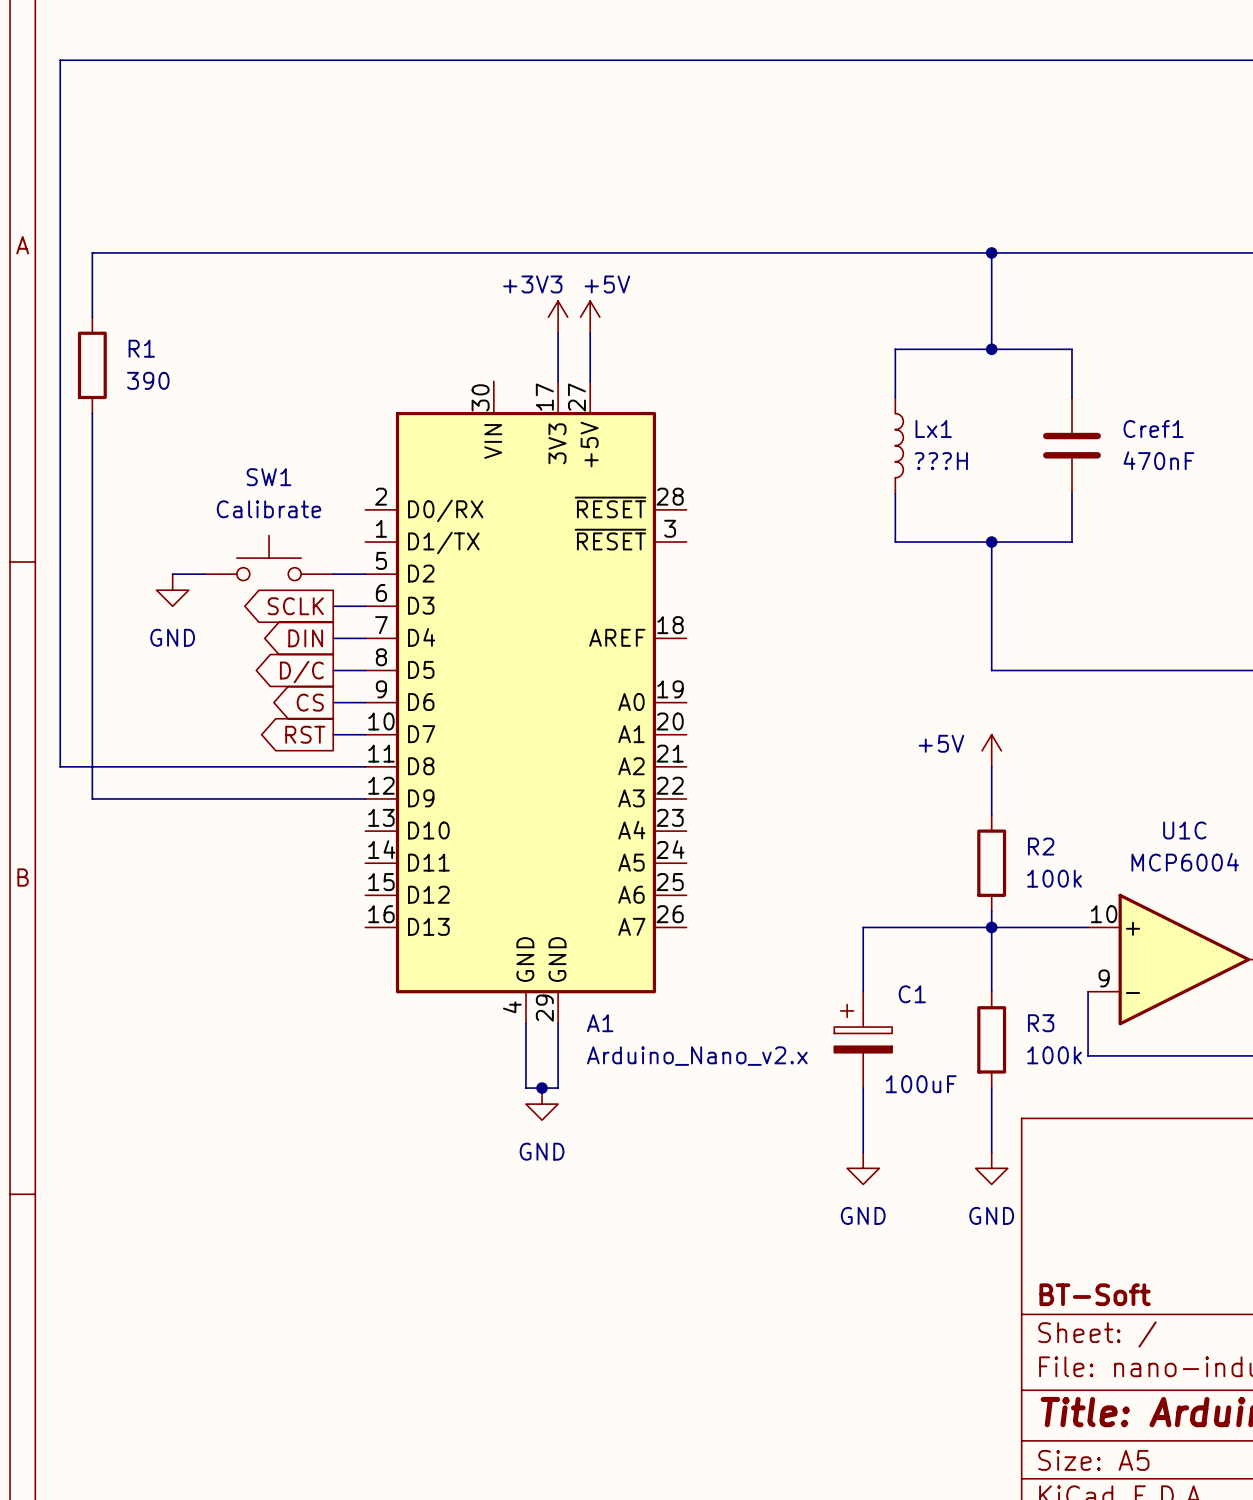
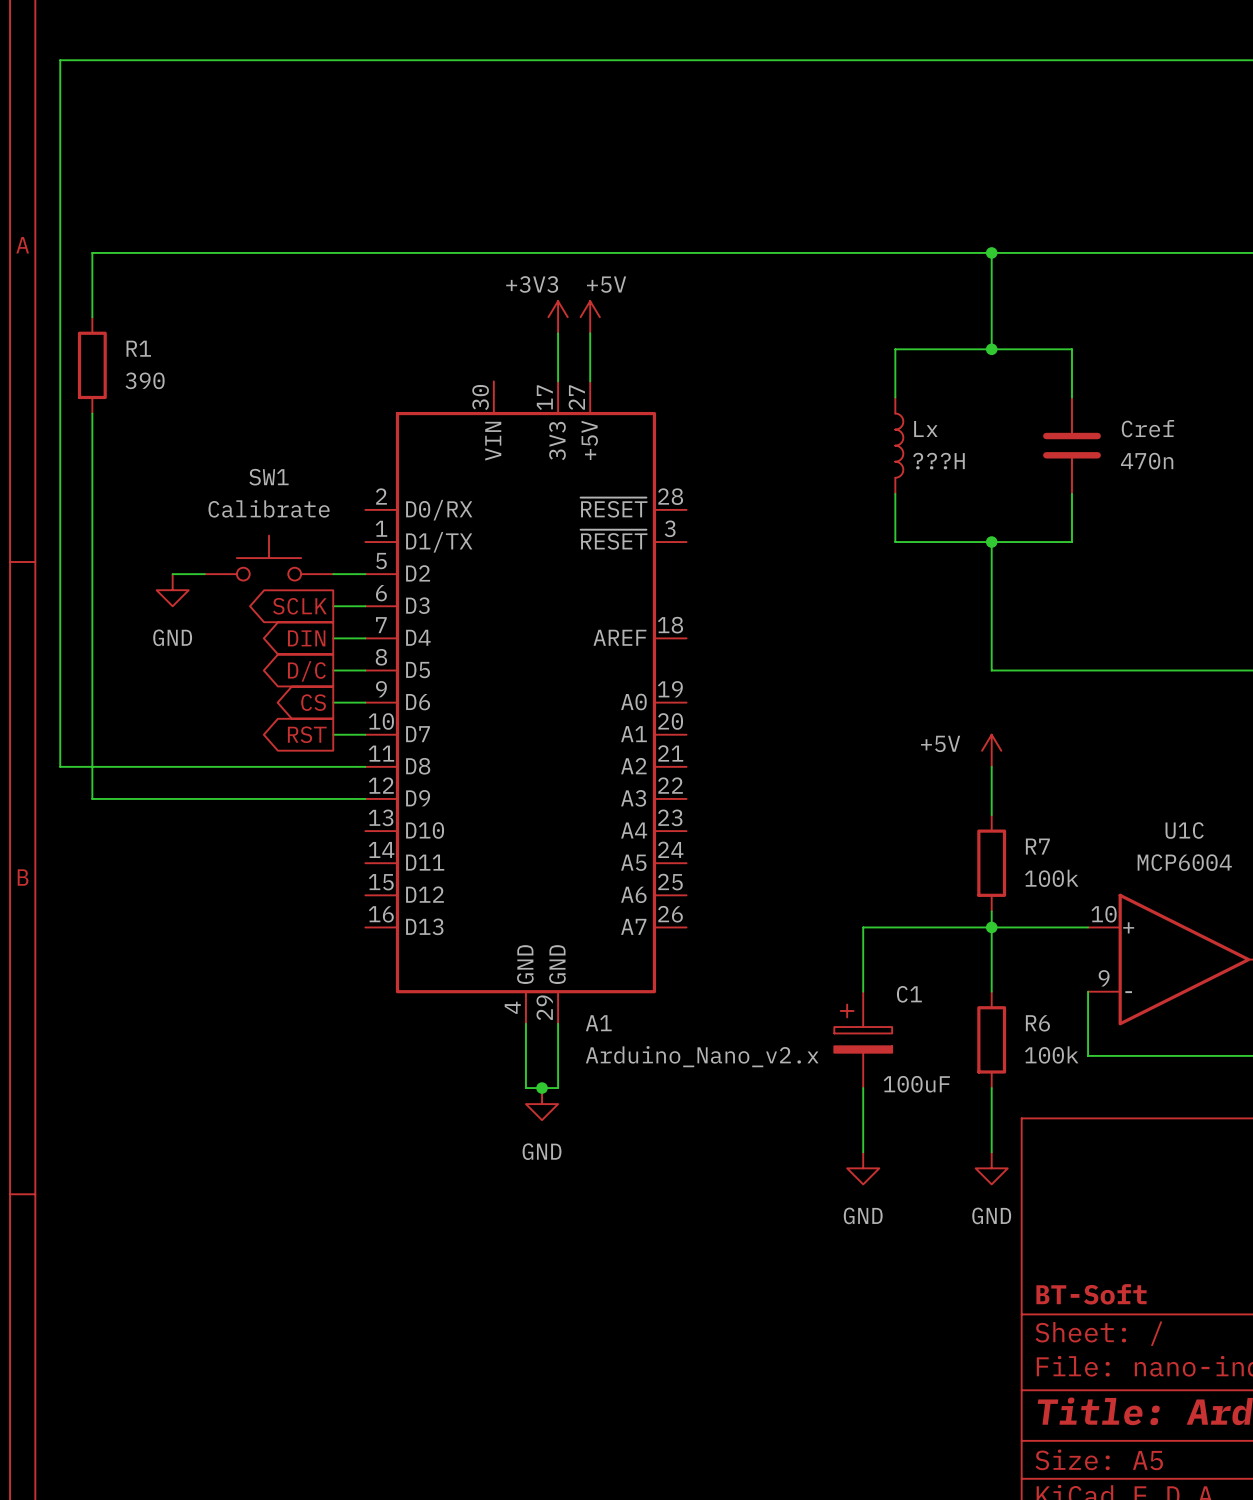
Lx1 name: Lx1 (933, 429) -> Lx (925, 429)
Cref1 name: Cref1 (1153, 429) -> Cref (1147, 428)
Cref1 value: 470nF (1158, 460) -> 470n (1147, 461)
R2 name: R2 (1041, 846) -> R7 (1037, 846)
R3 name: R3 (1041, 1023) -> R6 (1037, 1023)

